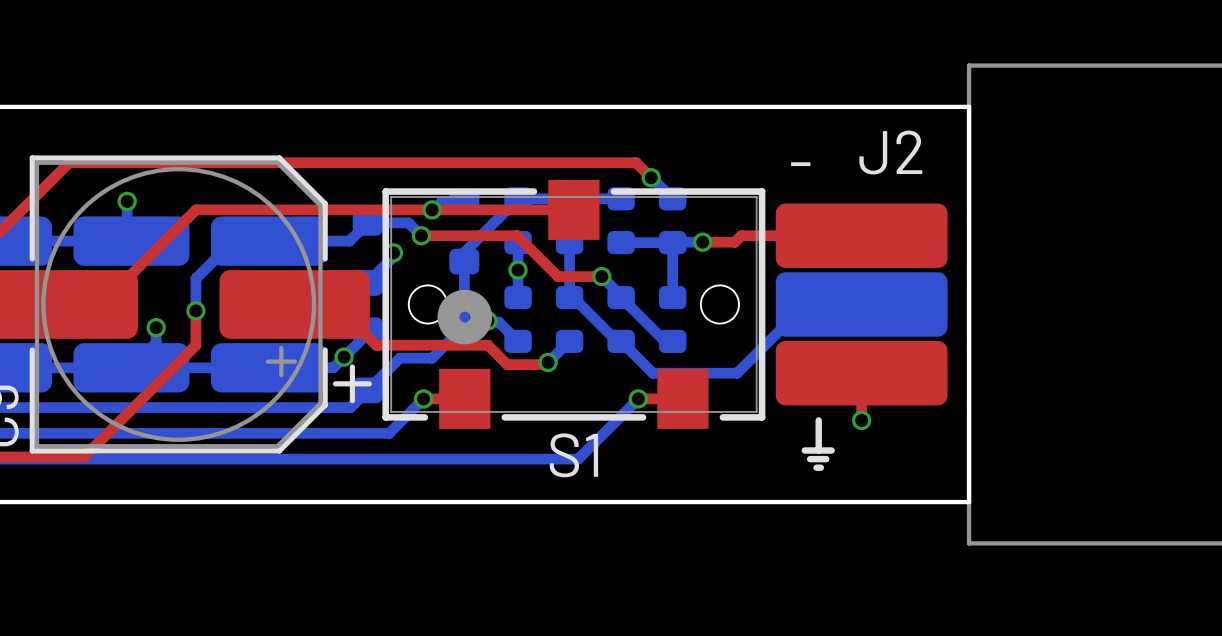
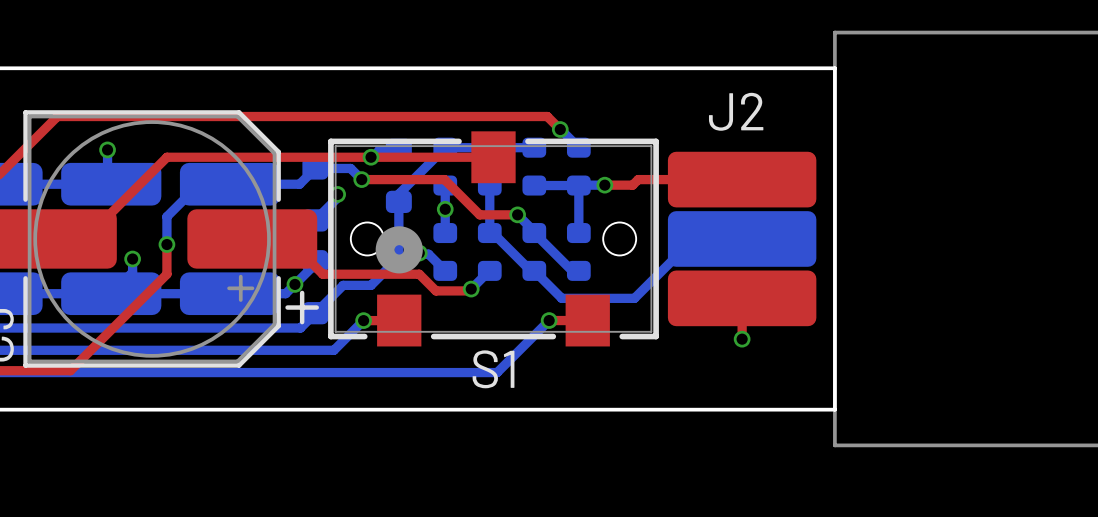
J2 name position: J2 (890, 152) -> J2 (736, 111)
text: - (800, 164) -> none
line: (818, 420) (818, 450) -> none
line: (804, 450) (831, 450) -> none
line: (810, 459) (826, 459) -> none
line: (816, 467) (820, 467) -> none

